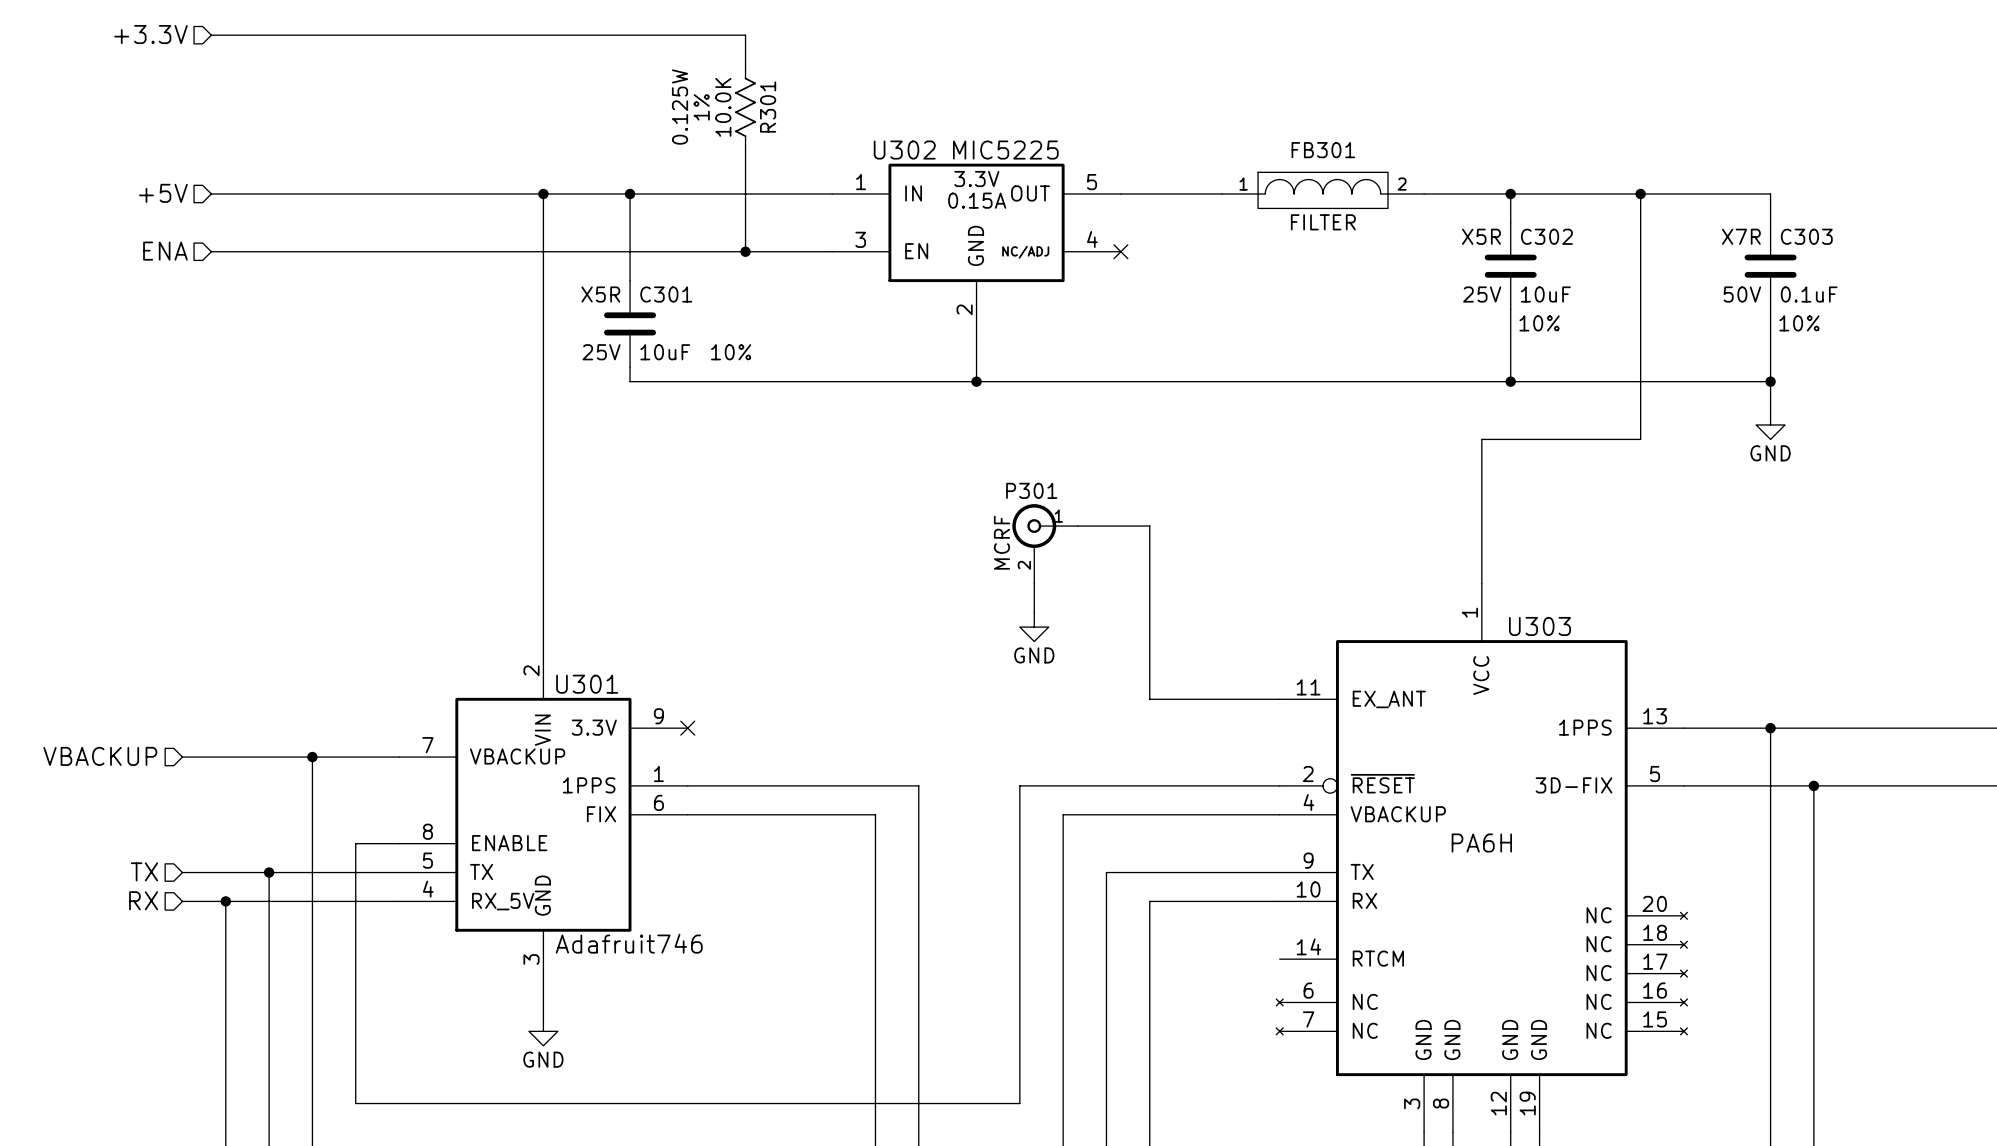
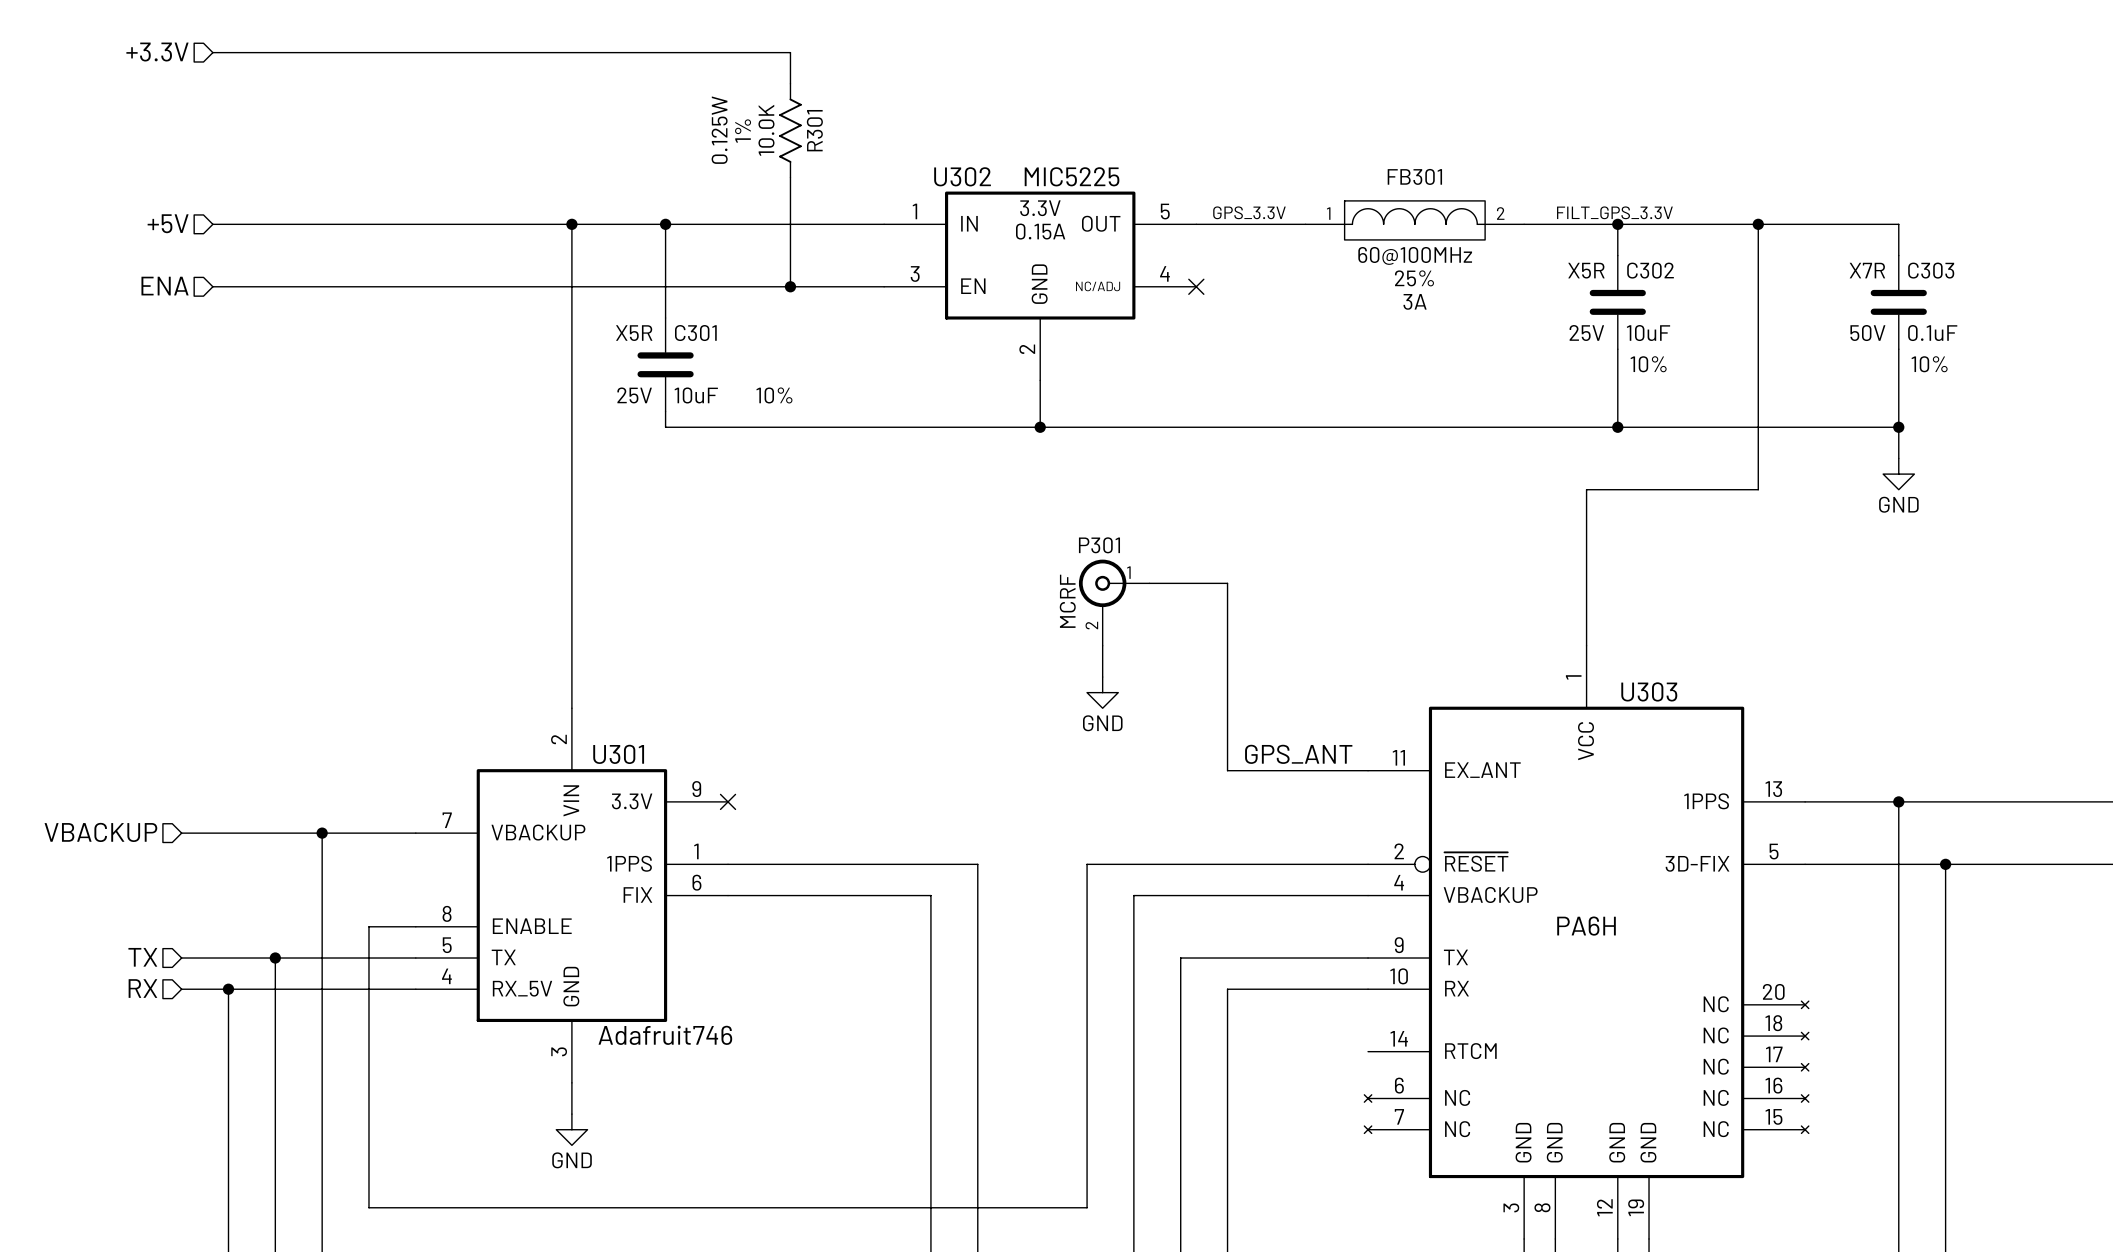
label: none -> GPS_3.3V (1249, 212)
label: none -> FILT_GPS_3.3V (1614, 212)
FB301 value: FILTER (1323, 222) -> 60@100MHz (1415, 255)
FB301 text: none -> 25% (1414, 278)
FB301 text: none -> 3A (1415, 301)
label: none -> GPS_ANT (1298, 754)

